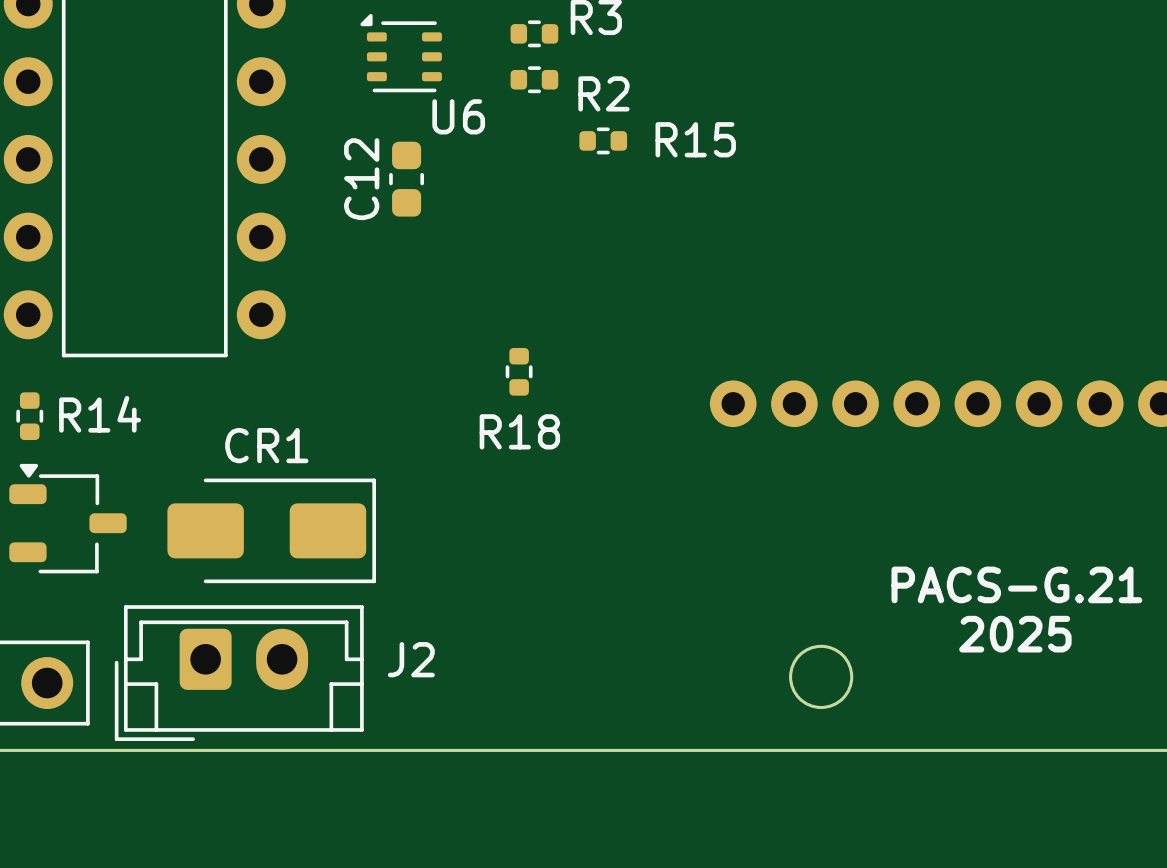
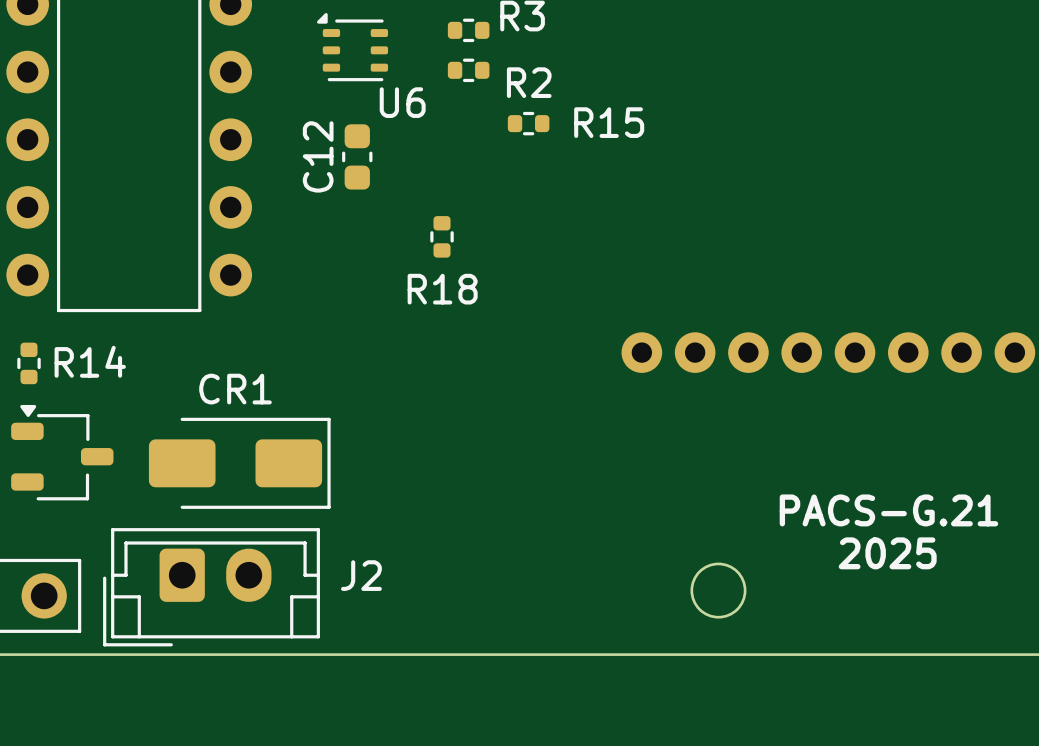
R18 position: (519, 371) -> (442, 236)

